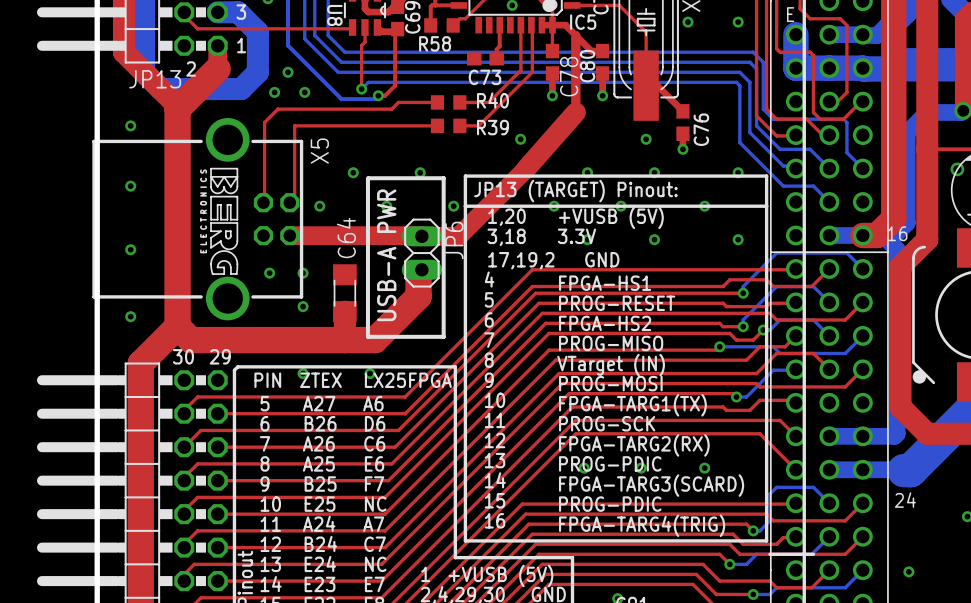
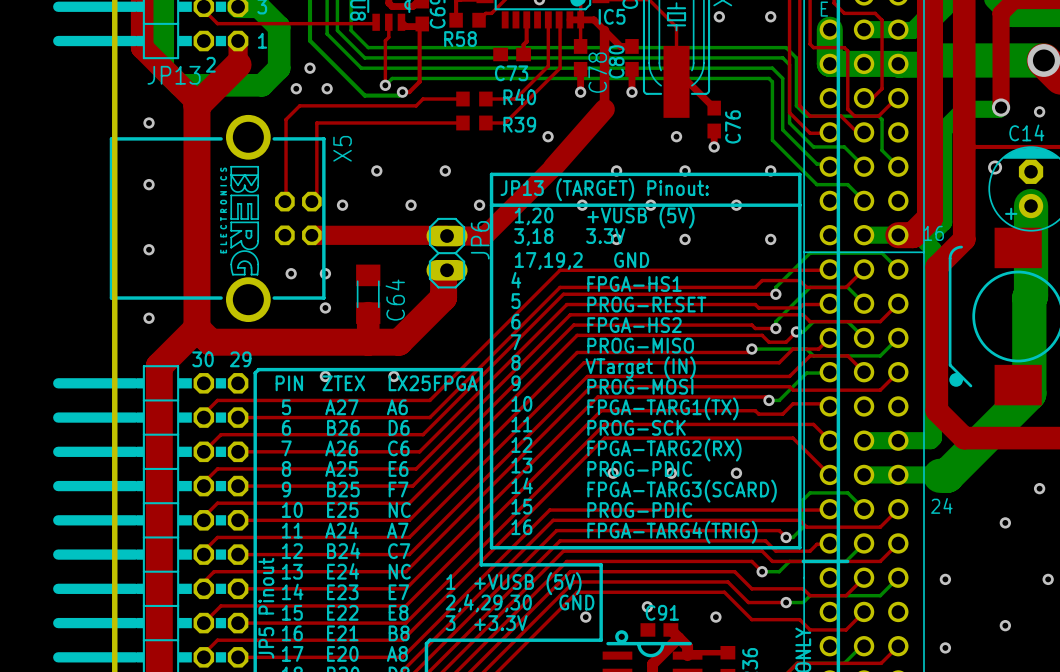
line: (367, 178) (367, 336) (443, 336) (443, 178) (368, 178) -> none
C64 name position: C64 (346, 238) -> C64 (395, 300)
text: USB-A PWR (386, 255) -> none

